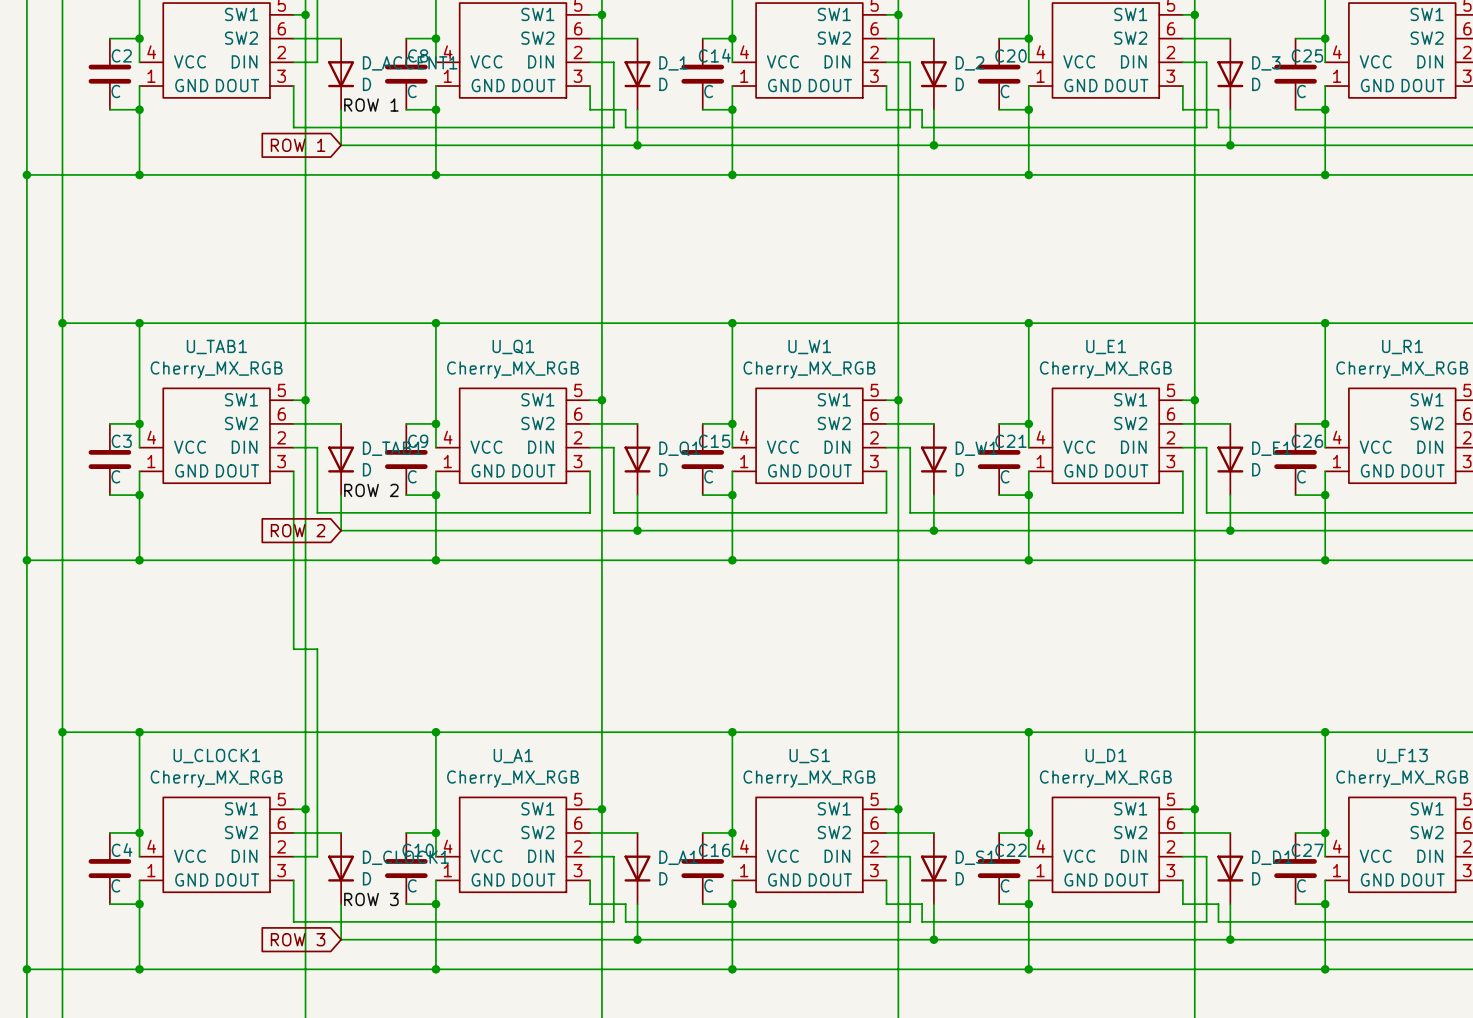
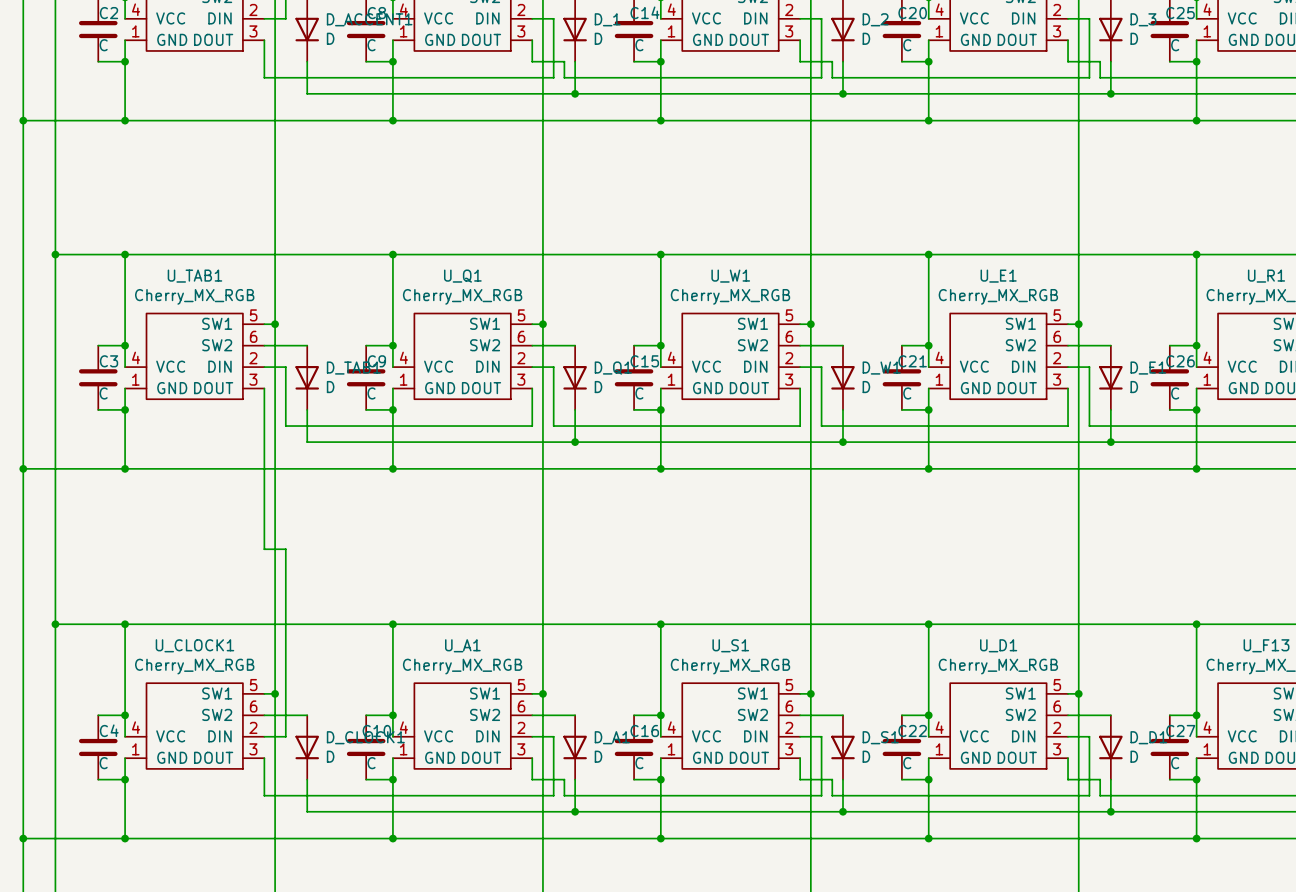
label: ROW 1 (371, 105) -> none
global label: ROW 1 (298, 145) -> none
label: ROW 2 (371, 490) -> none
global label: ROW 2 (298, 530) -> none
label: ROW 3 (371, 899) -> none
global label: ROW 3 (298, 939) -> none

